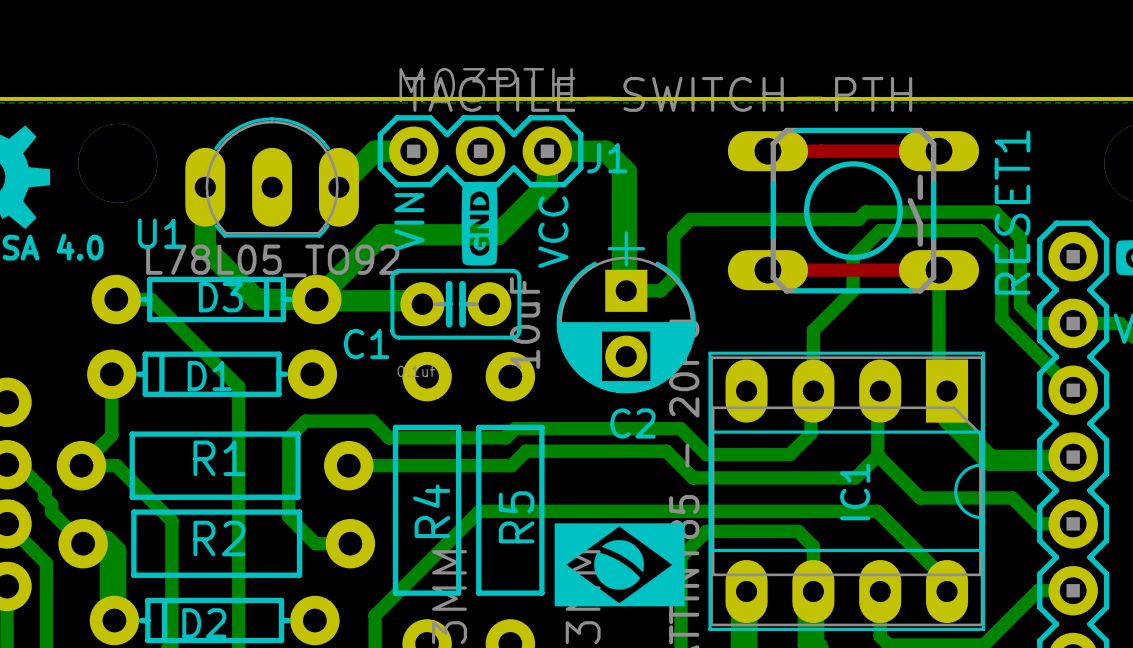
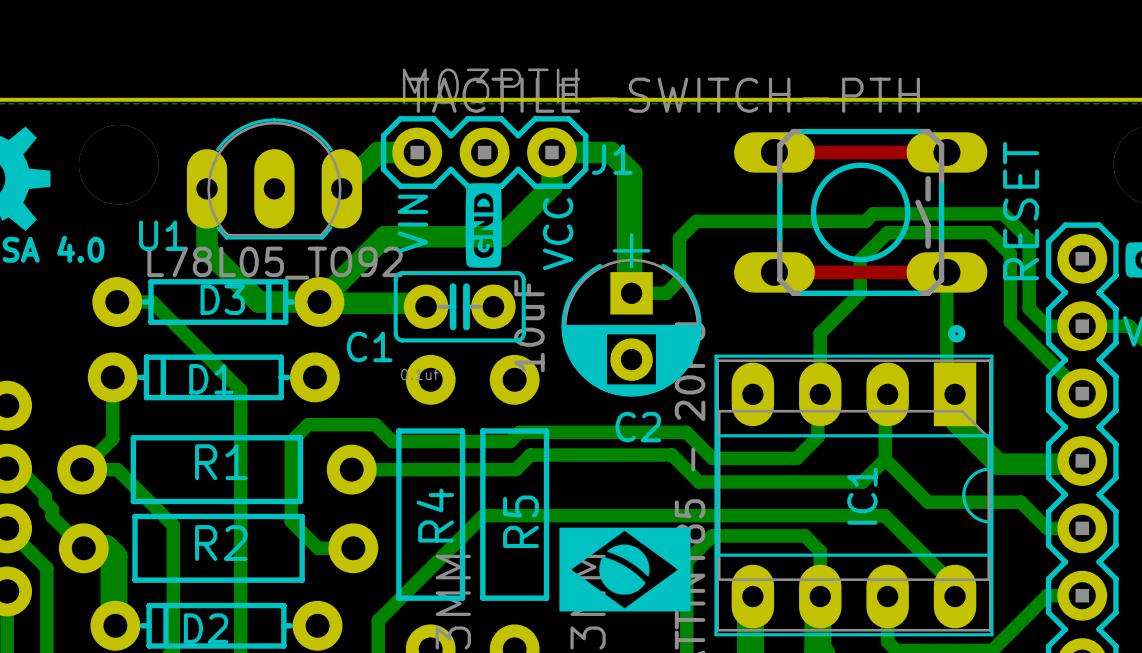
RESET1 name: RESET1 (1012, 212) -> RESET (1021, 211)
drawing: none -> [948, 325, 966, 343]

